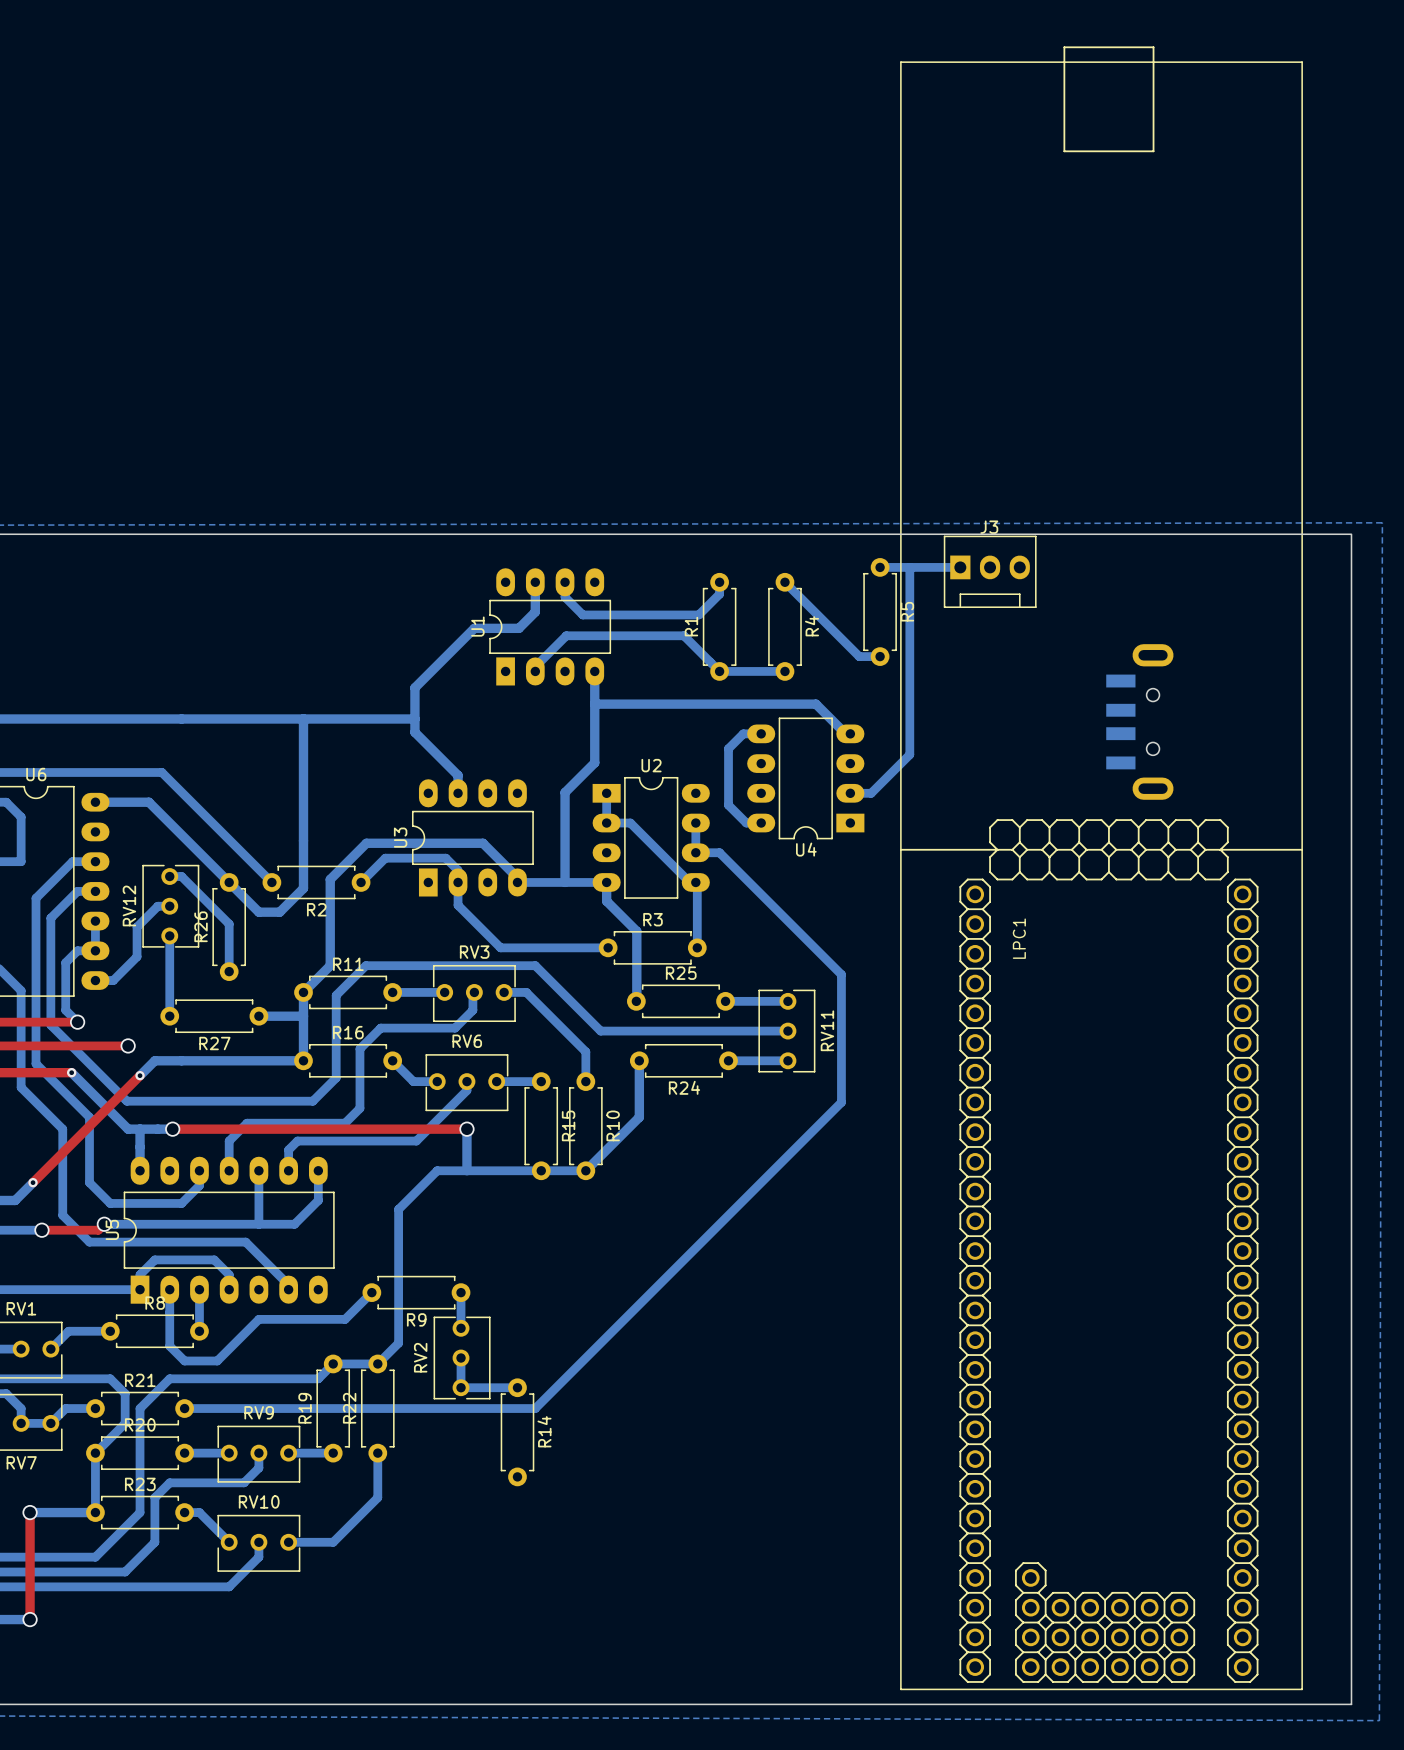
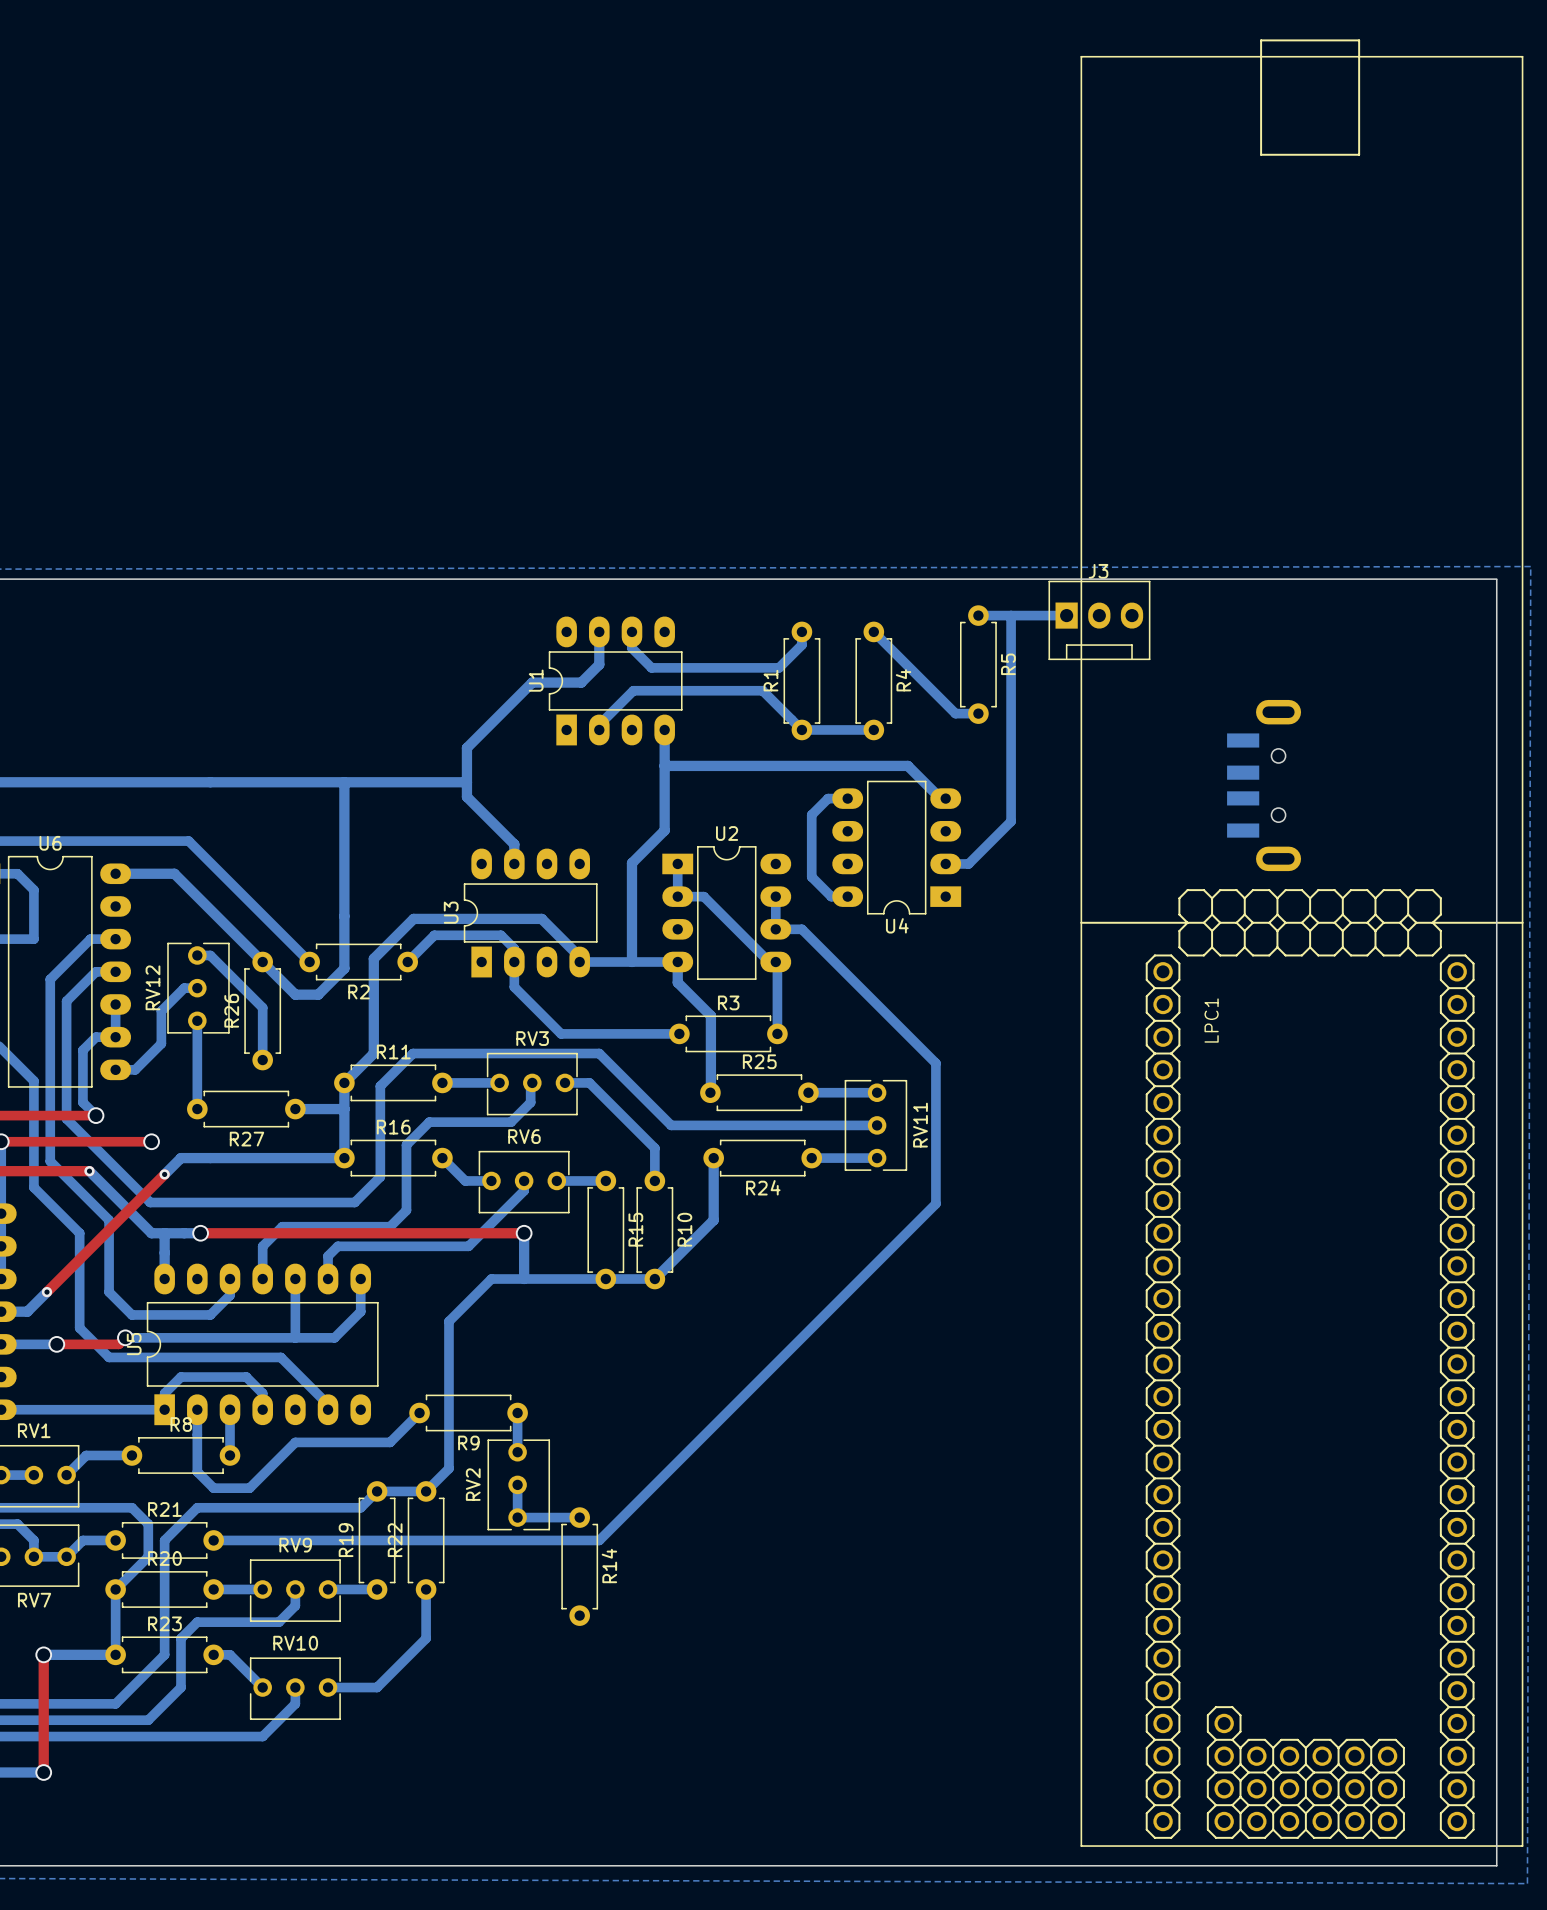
LPC1 position: (1101, 868) -> (1301, 943)

